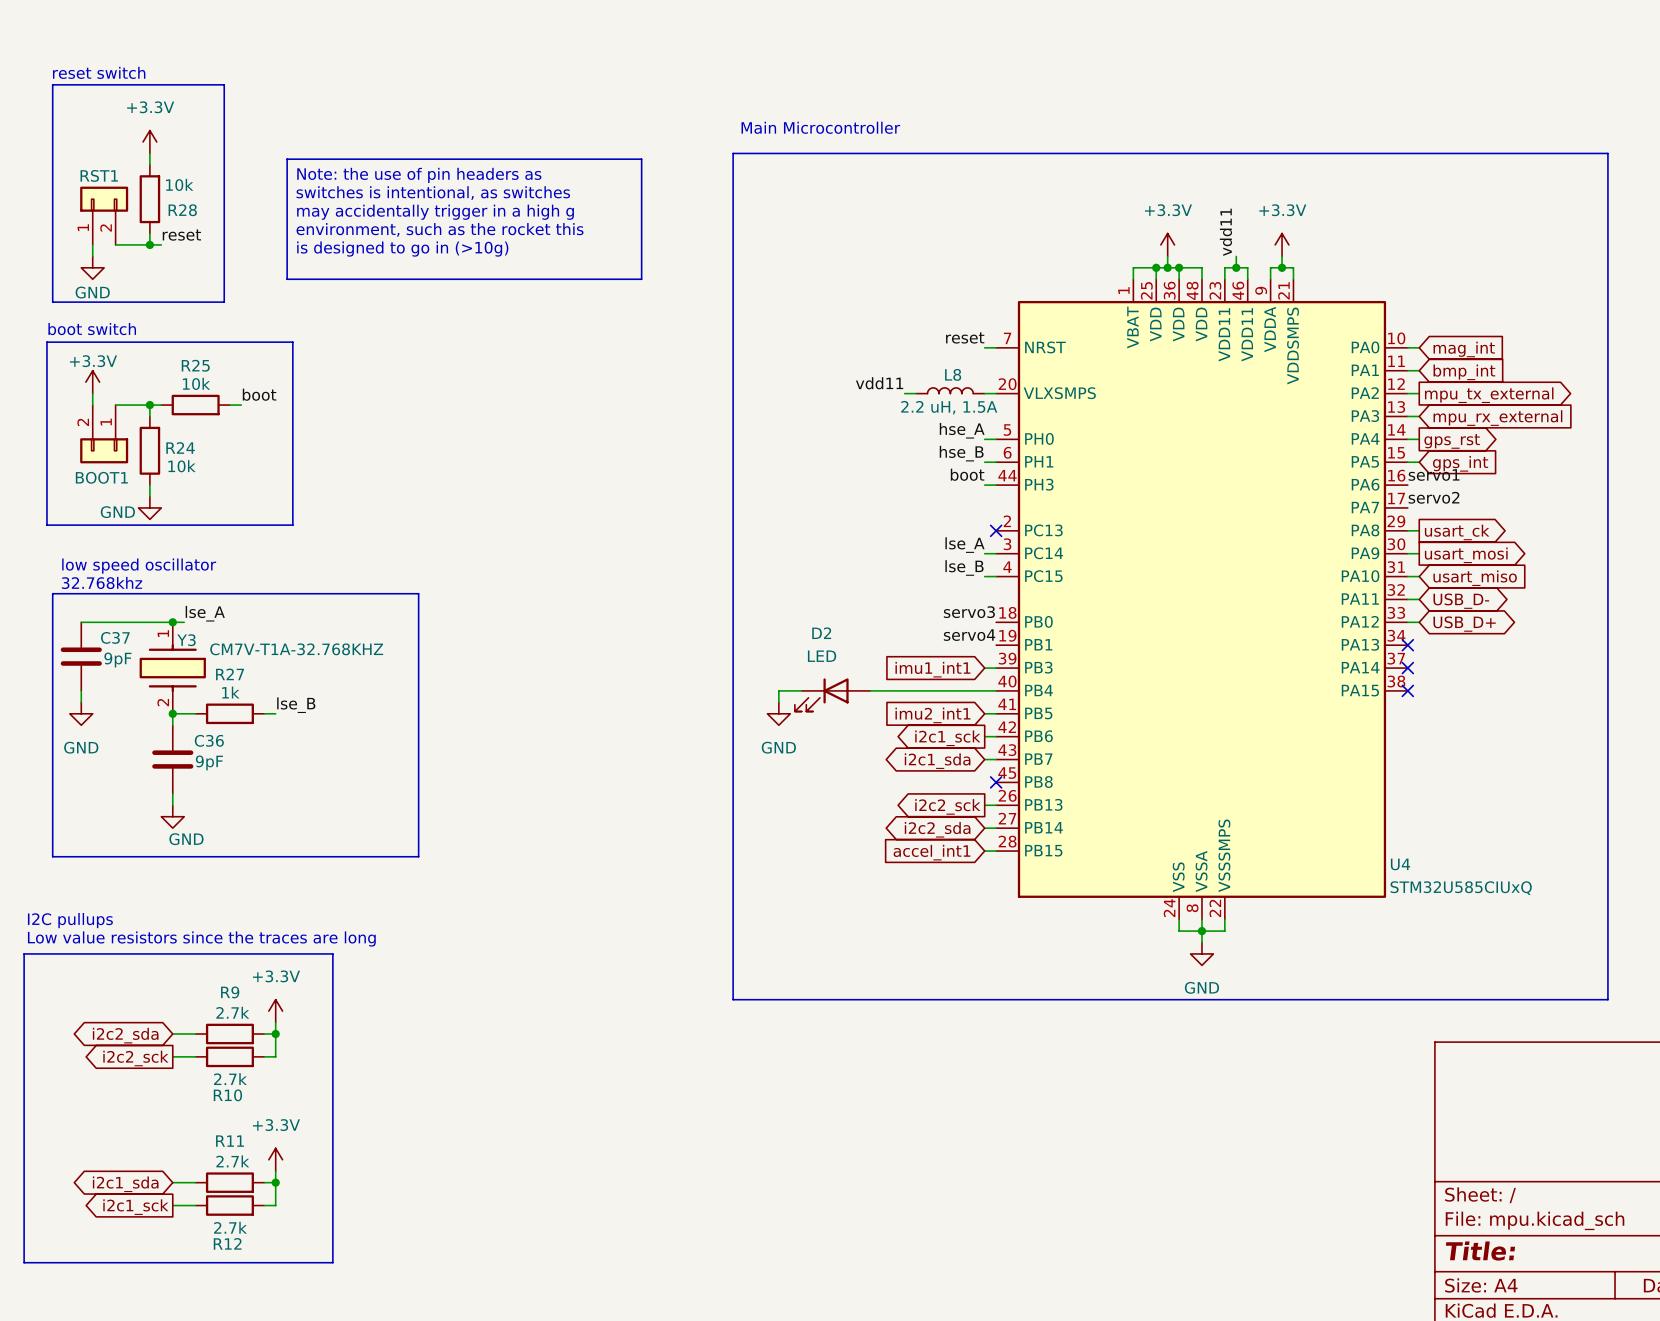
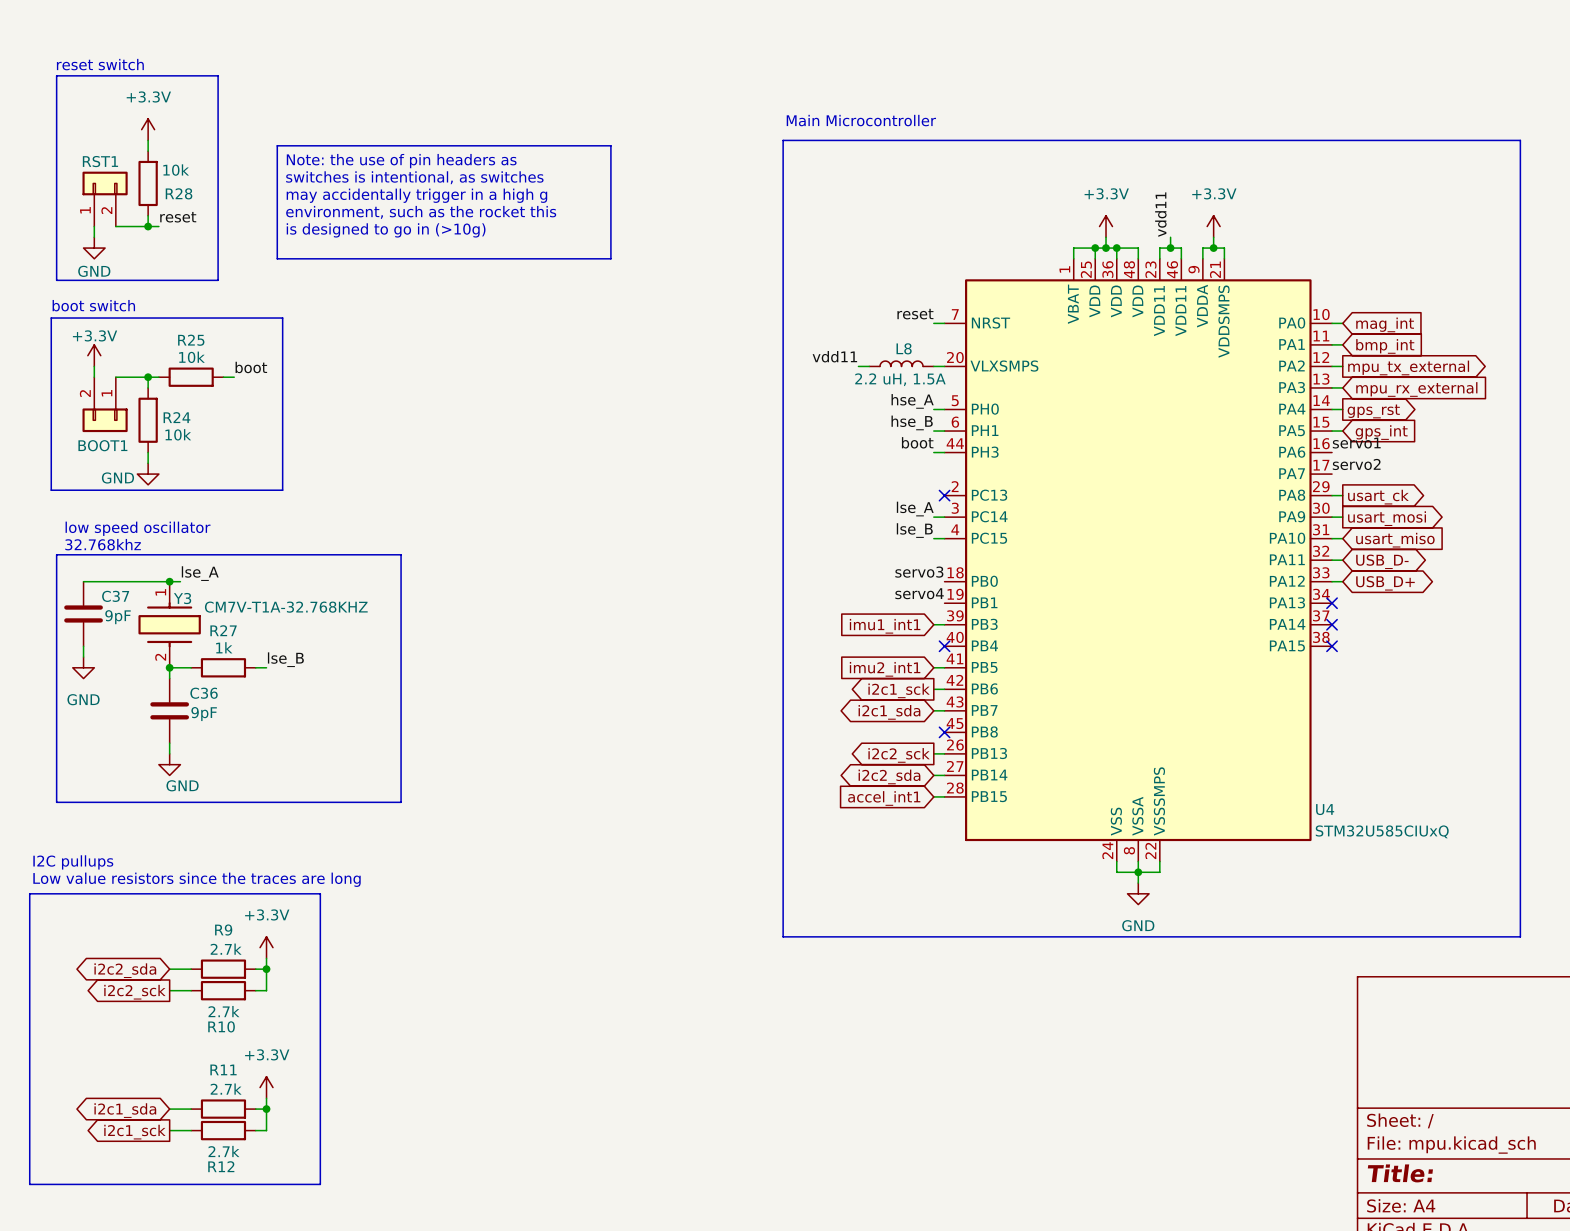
text position: Main Microcontroller (820, 127) -> Main Microcontroller (861, 120)
line: (824, 153) (733, 153) (733, 999) (824, 999) -> (783, 140) (783, 936)
wire: (801, 690) (778, 690) (778, 702) -> none
wire: (870, 690) (996, 690) -> none
no-connect mark: none -> (944, 646)
D2: LED (832, 694) -> none
power symbol: GND (778, 713) -> none

